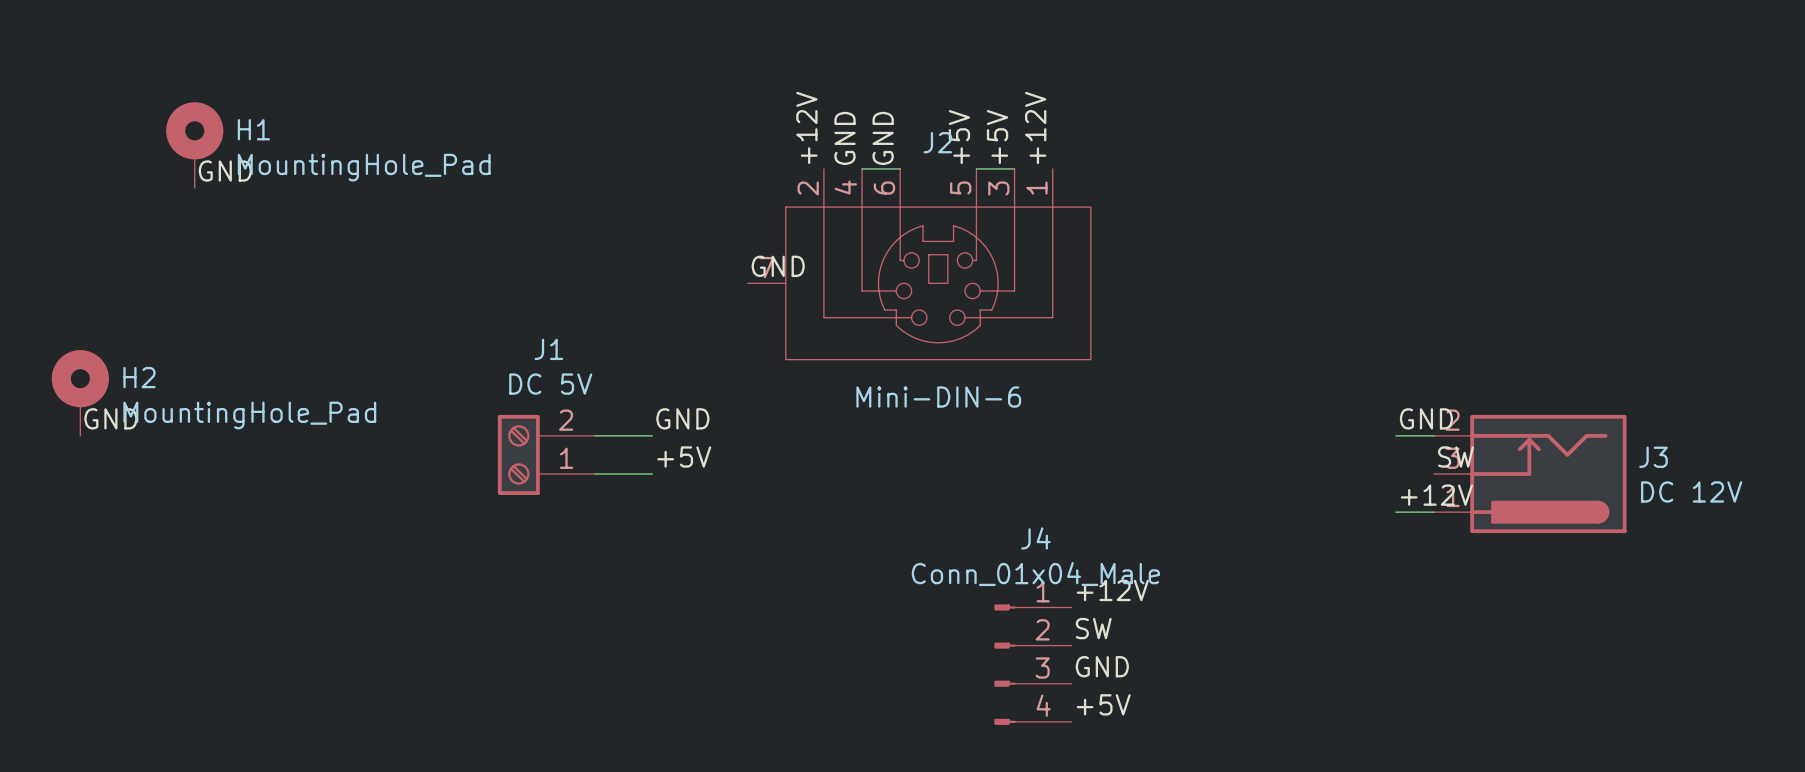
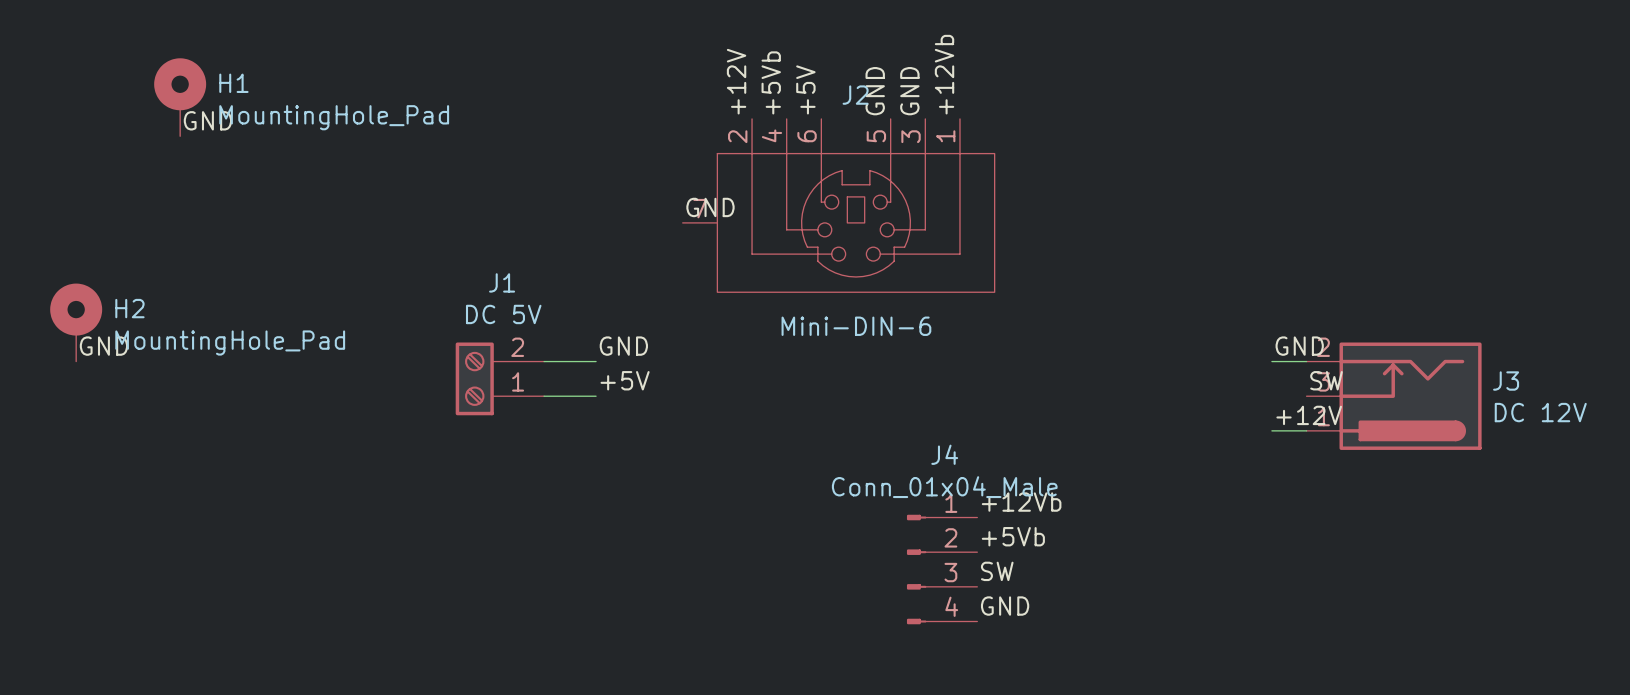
label: +12V (1035, 127) -> +12Vb (944, 74)
label: +5V (959, 137) -> GND (875, 91)
label: +5V (997, 137) -> GND (909, 91)
label: GND (845, 138) -> +5Vb (771, 82)
label: GND (883, 138) -> +5V (805, 89)
wire: (862, 168) (900, 168) -> none
wire: (976, 168) (1014, 168) -> none
label: +12V (1112, 590) -> +12Vb (1021, 502)
label: SW (1093, 628) -> +5Vb (1013, 536)
label: GND (1102, 666) -> SW (997, 571)
label: +5V (1103, 704) -> GND (1005, 606)

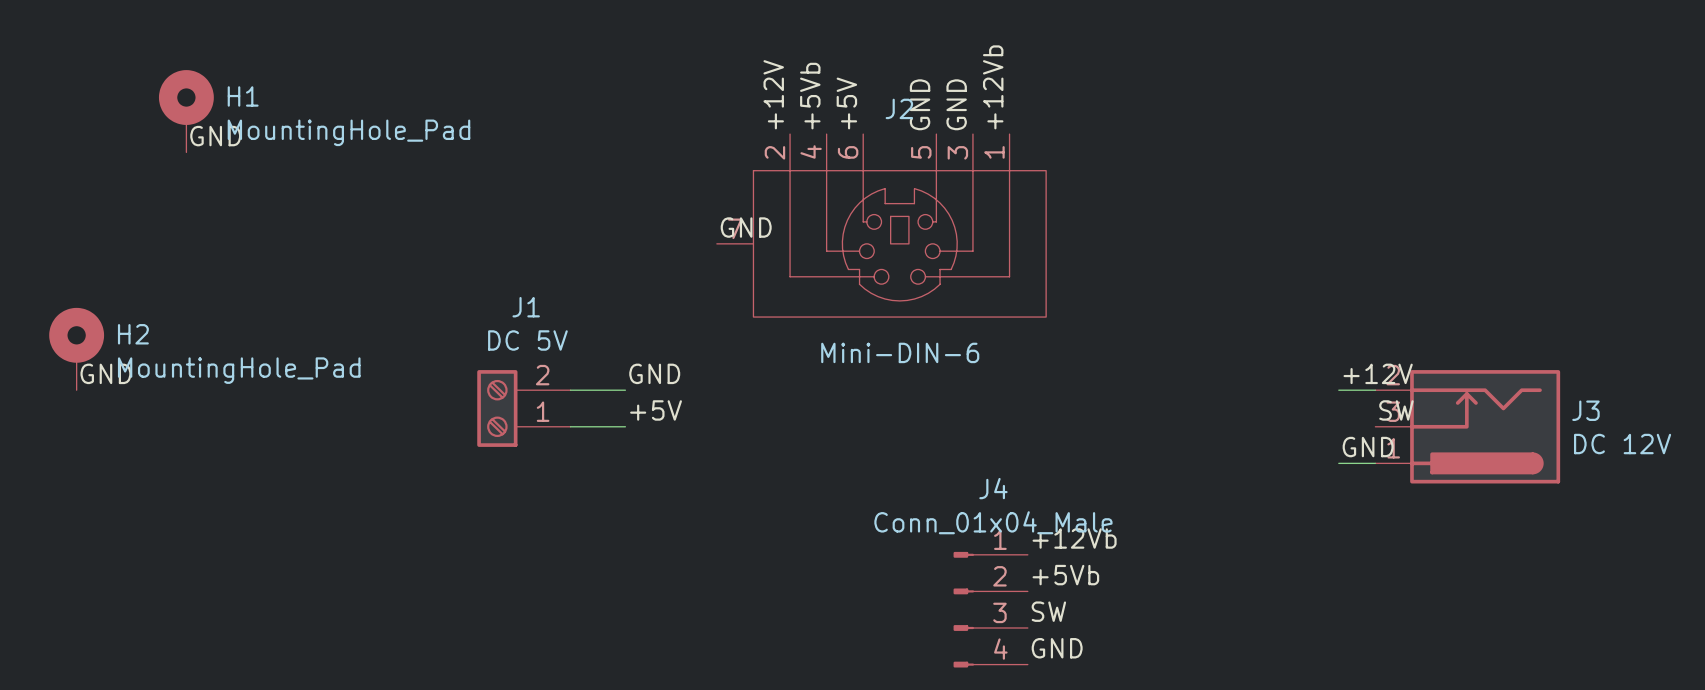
label: GND (1299, 346) -> +12V (1378, 373)
label: +12V (1309, 415) -> GND (1368, 447)

